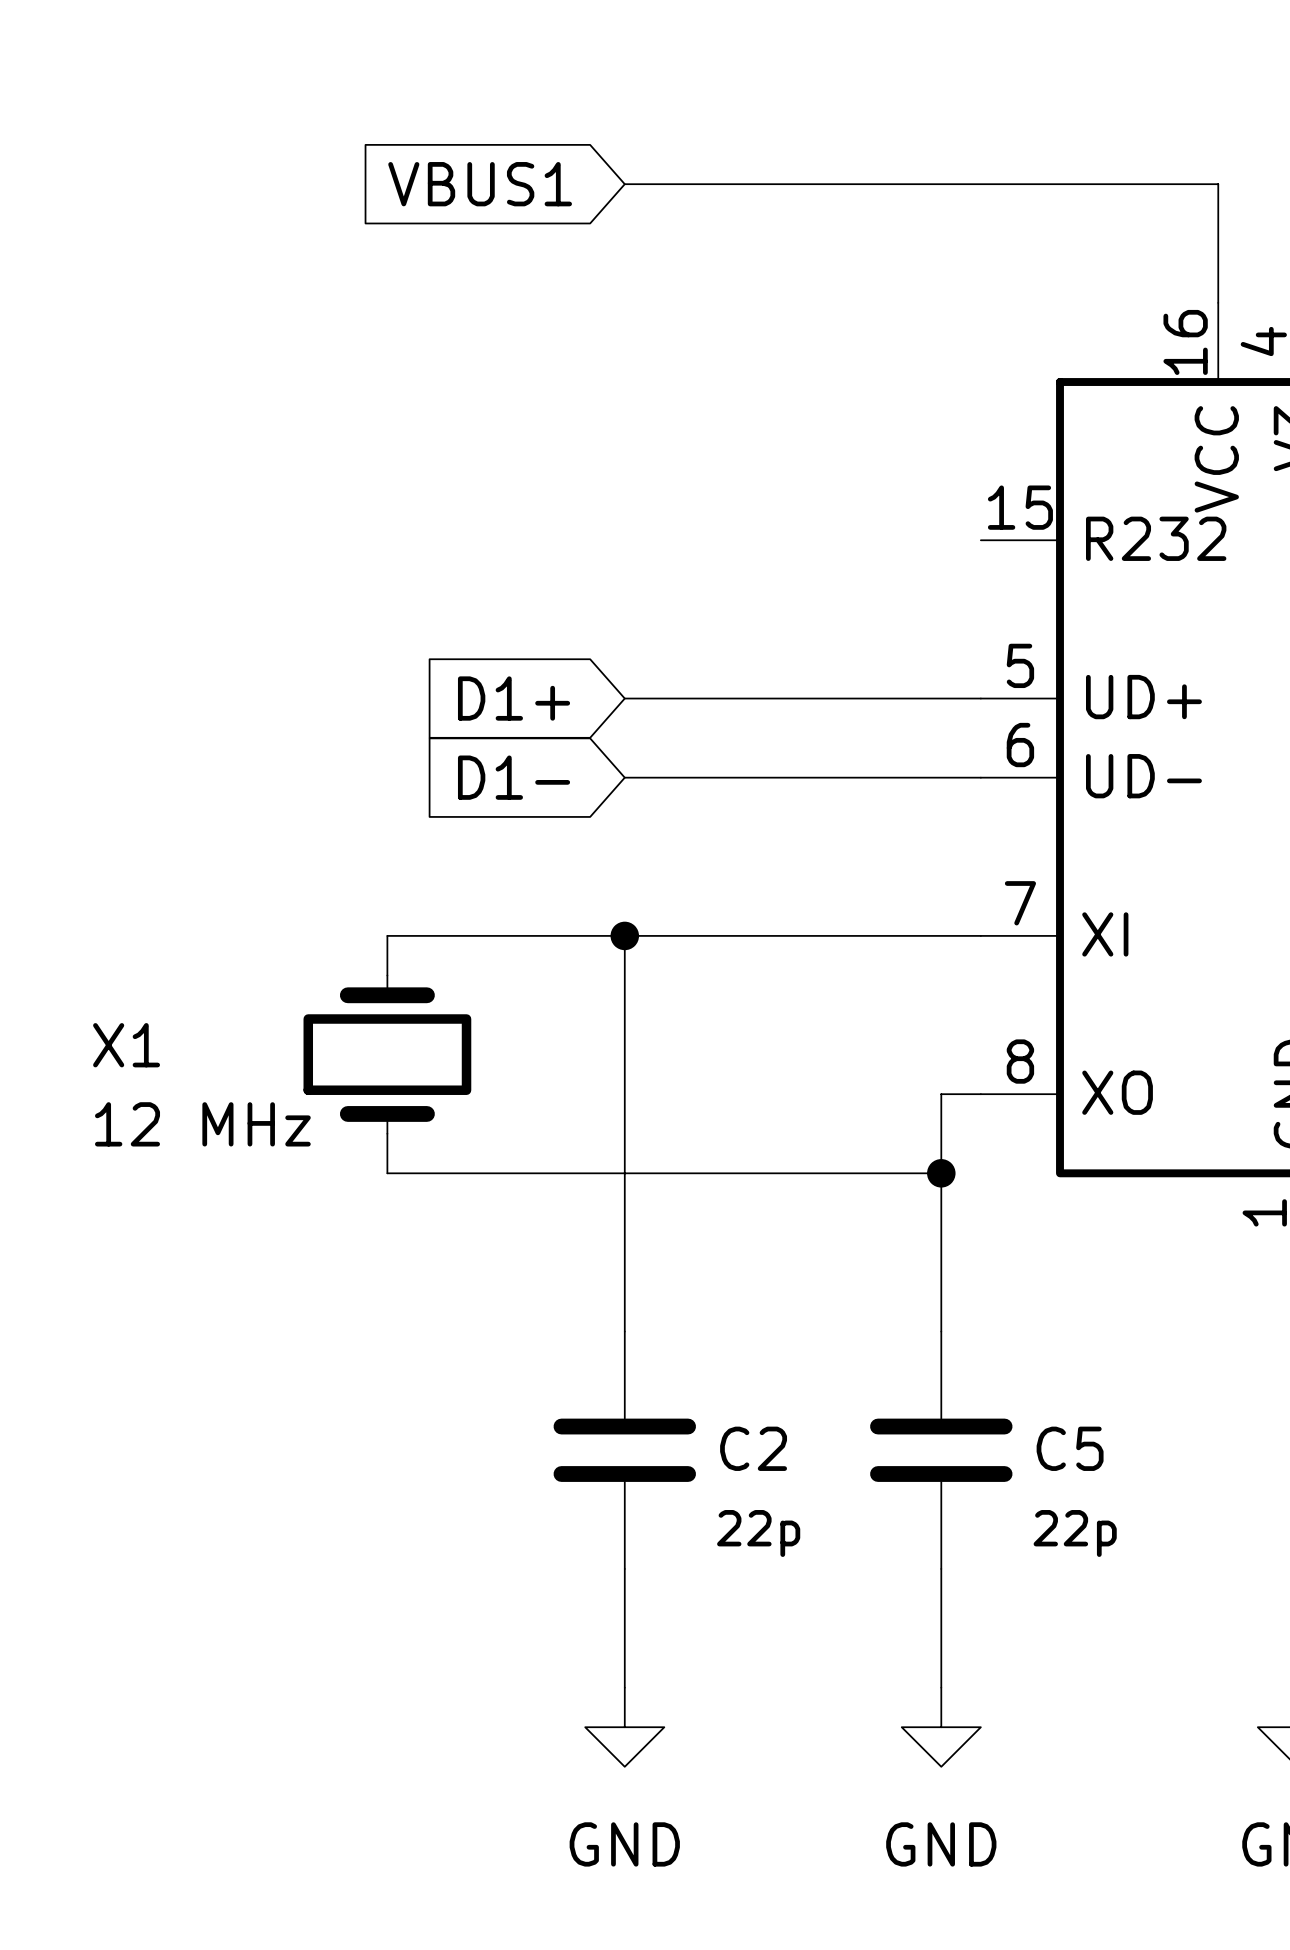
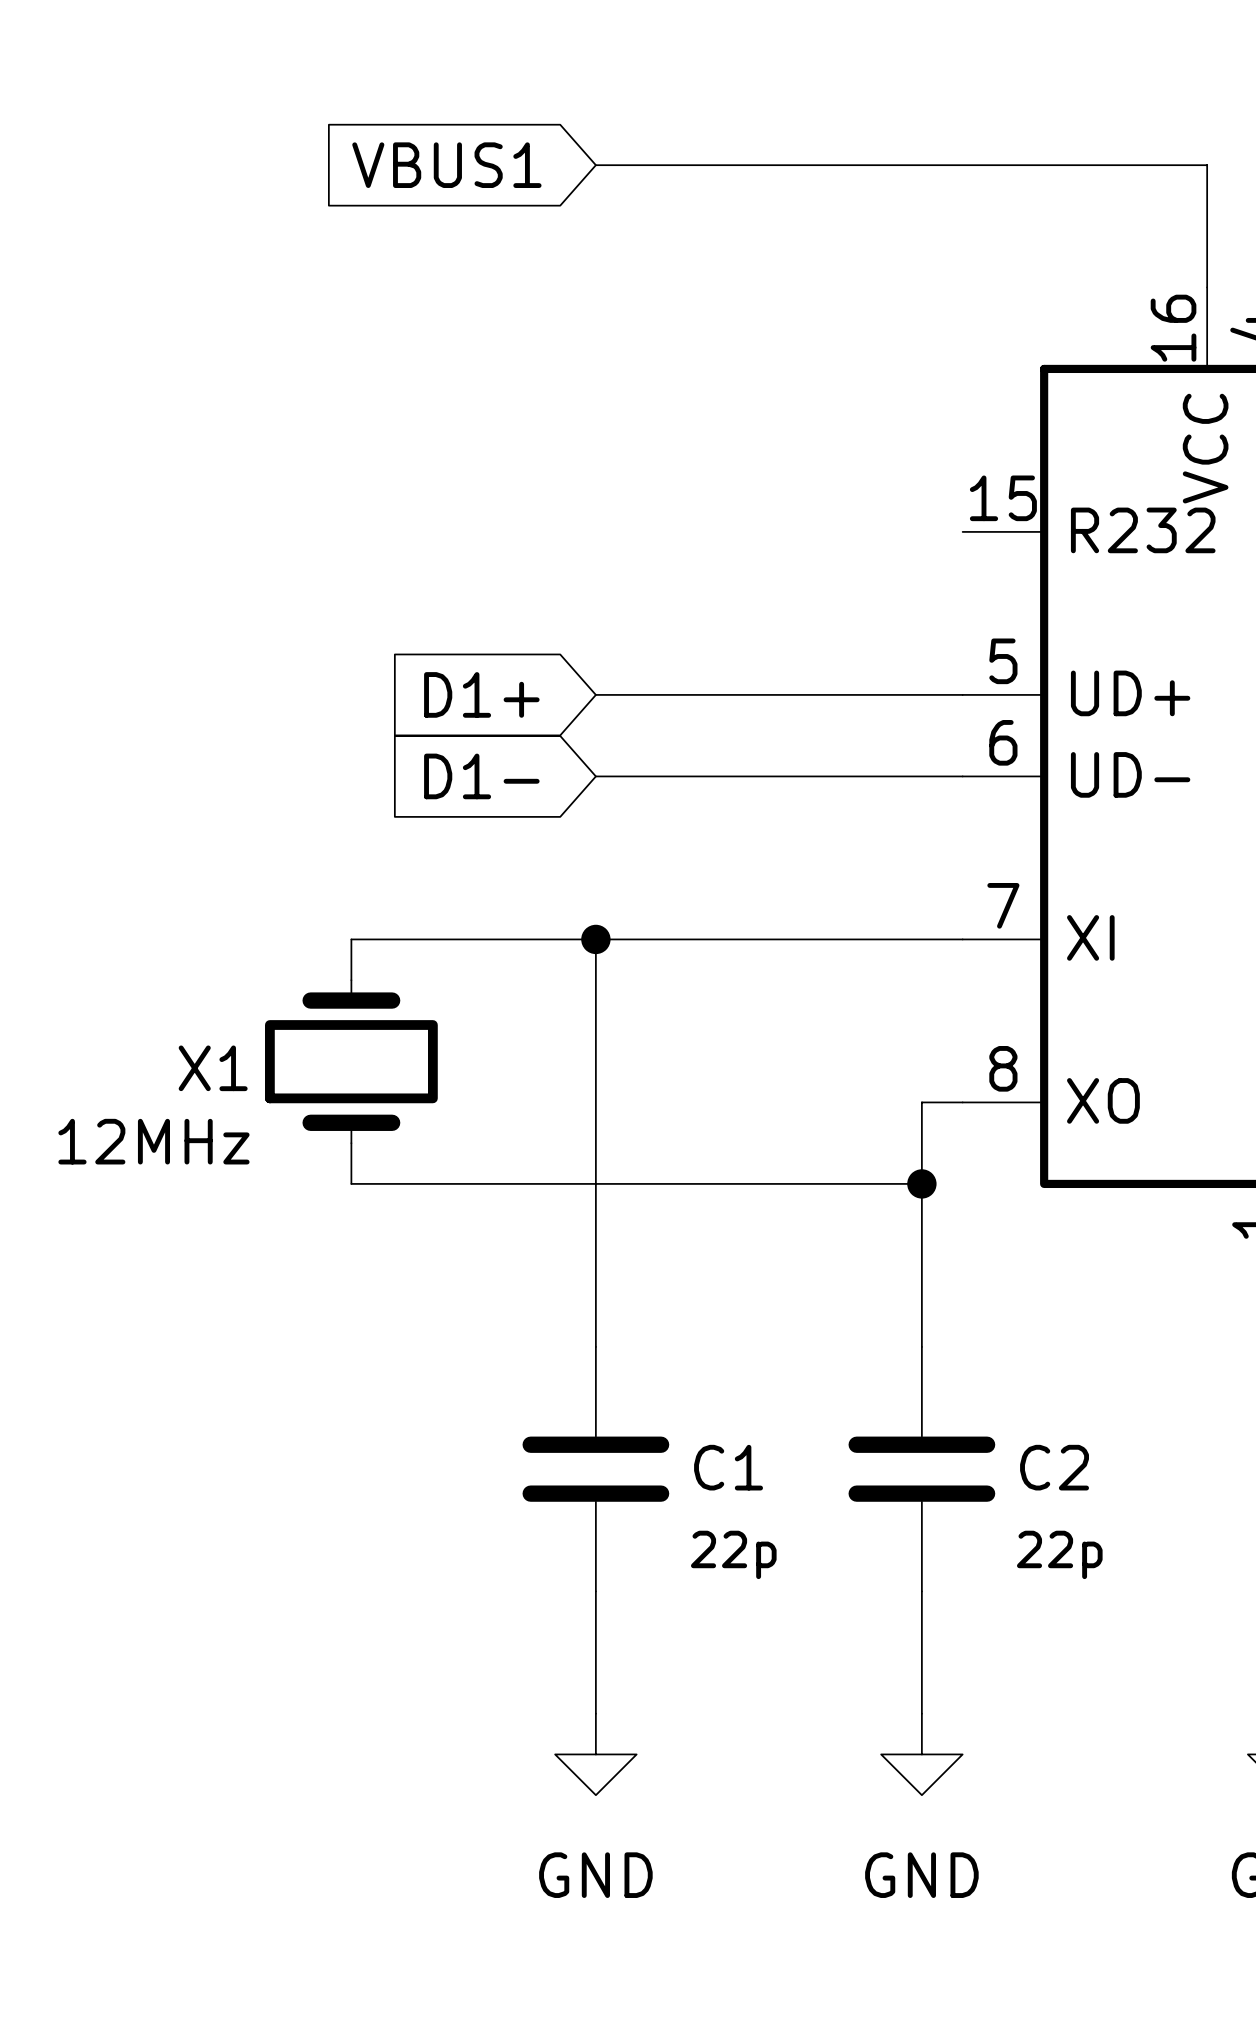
X1 name position: X1 (126, 1045) -> X1 (213, 1068)
X1 value: 12 MHz (202, 1124) -> 12MHz (153, 1141)
C2 name: C2 (753, 1448) -> C1 (728, 1467)
C5 name: C5 (1070, 1448) -> C2 (1054, 1467)

